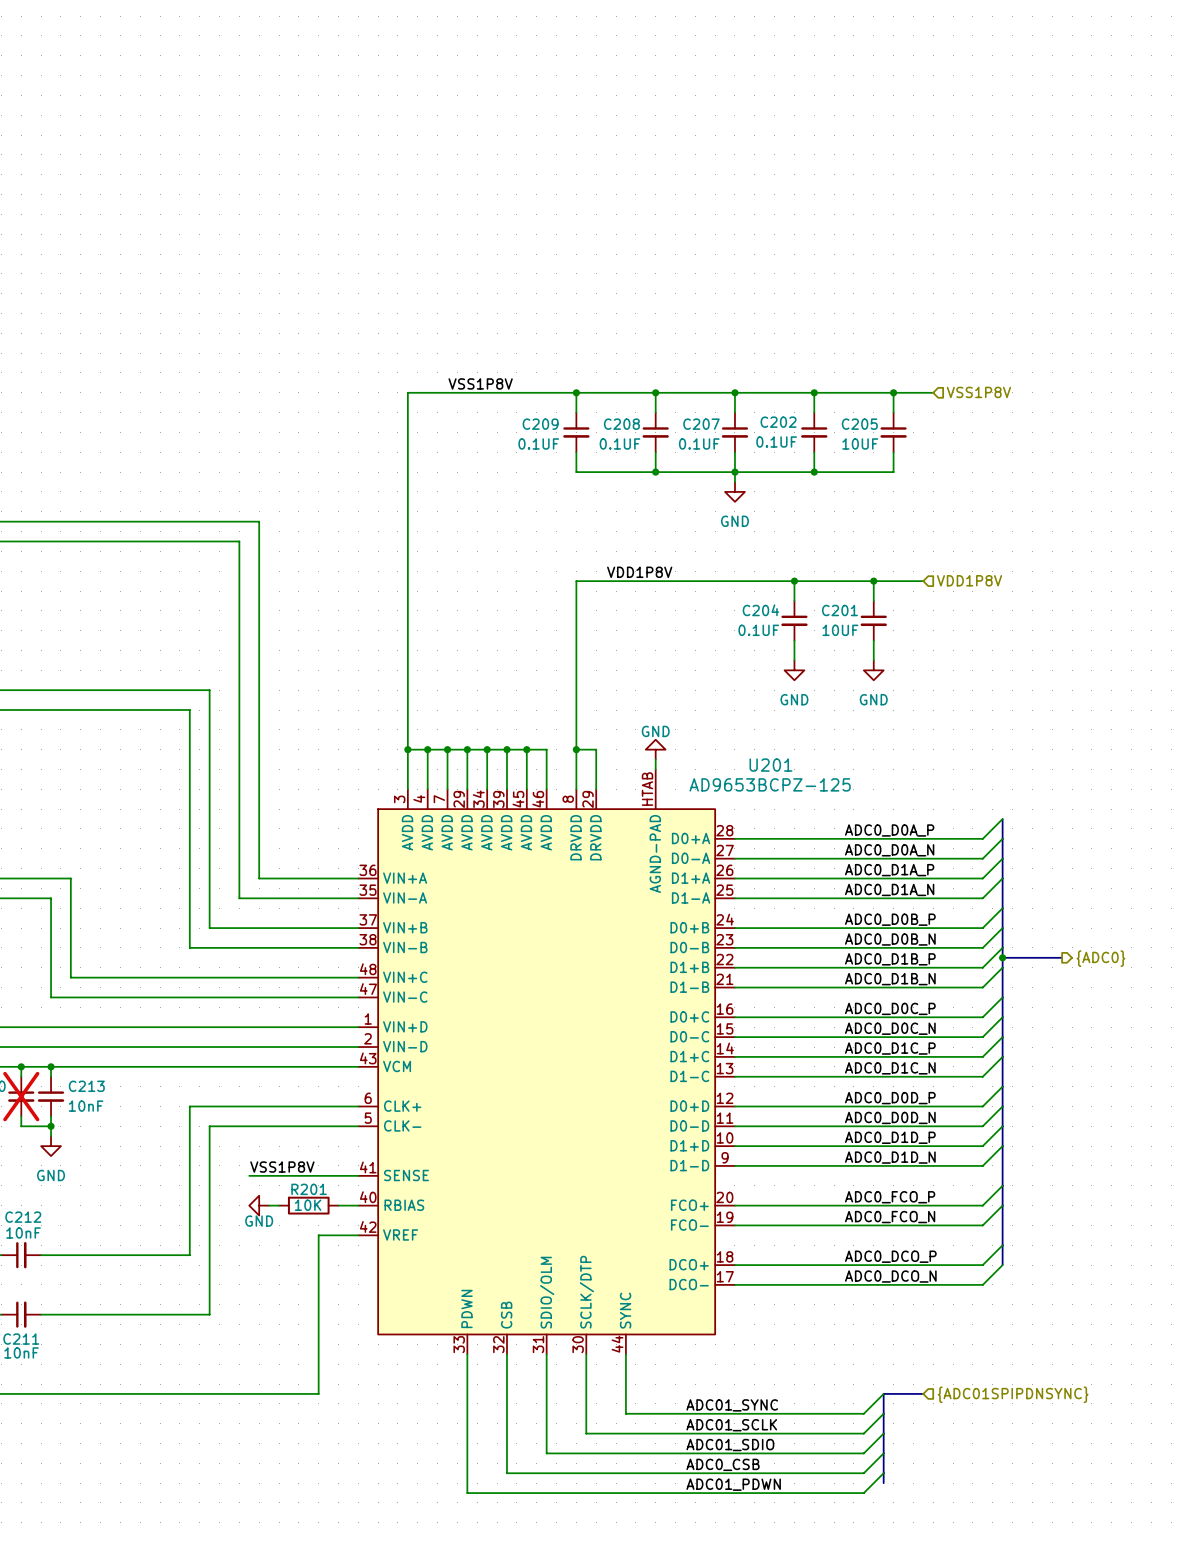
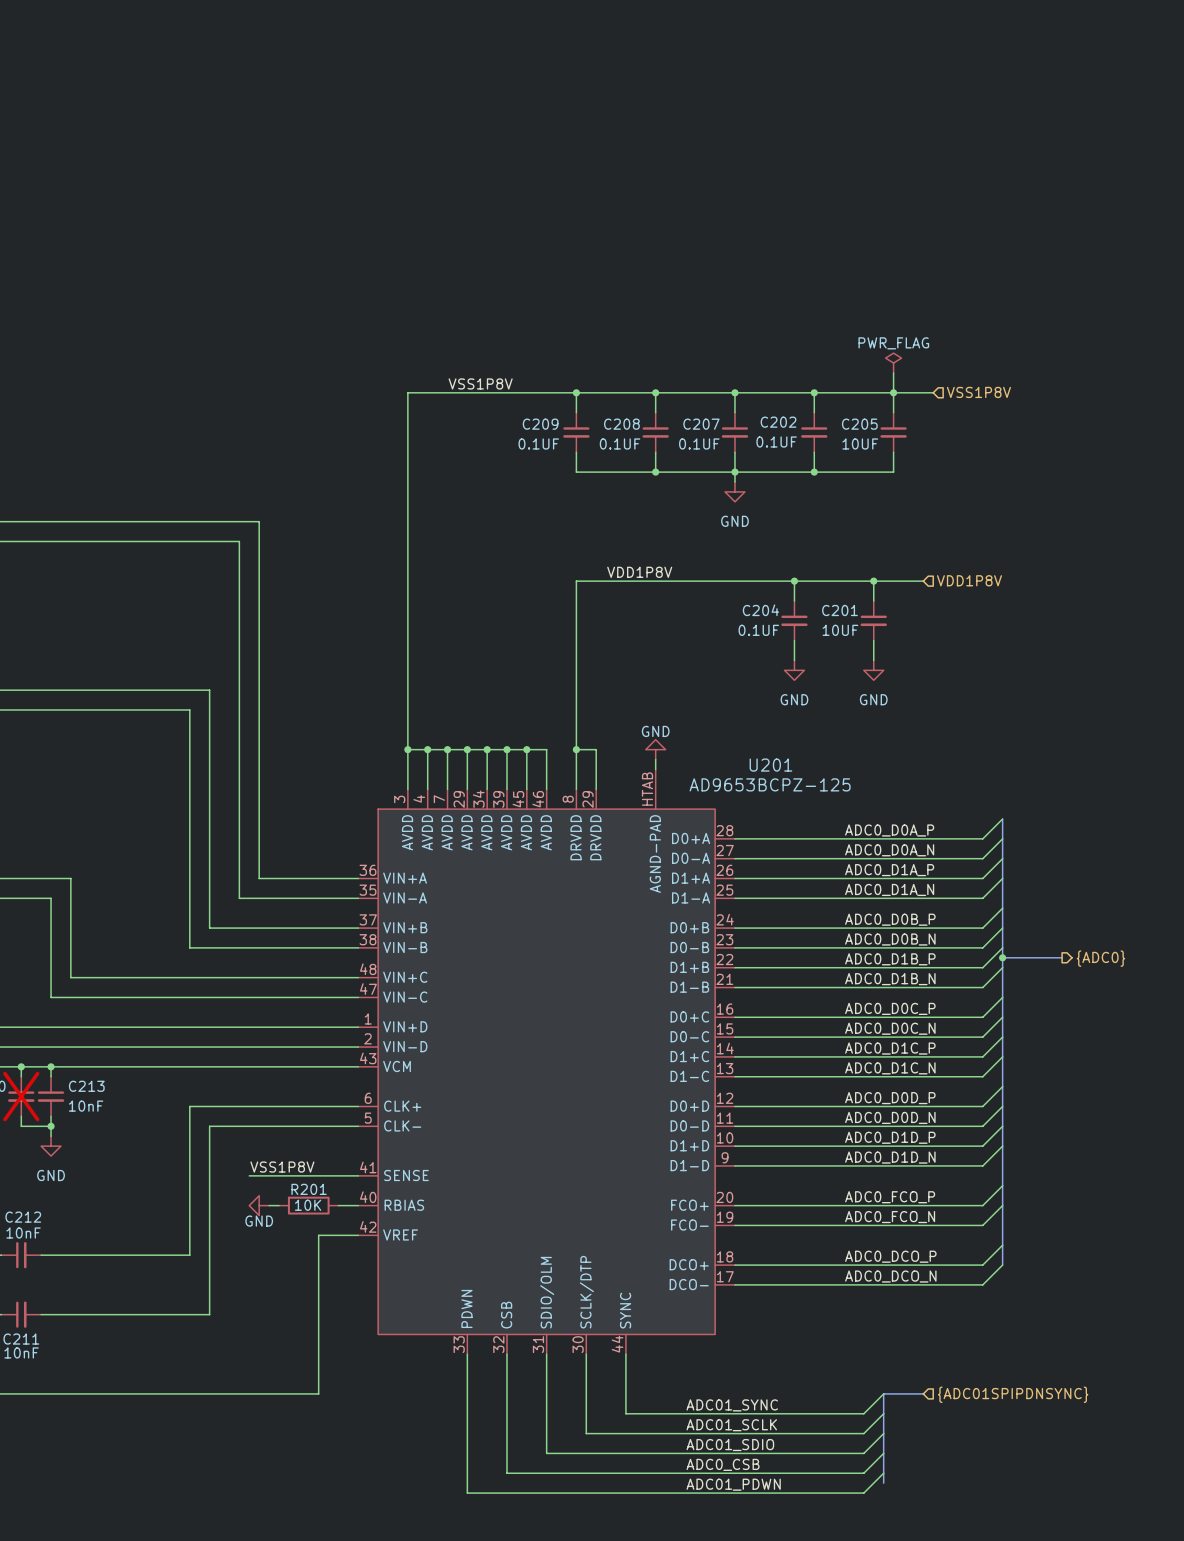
power symbol: none -> PWR_FLAG (893, 363)
wire: none -> (893, 372) (893, 392)

